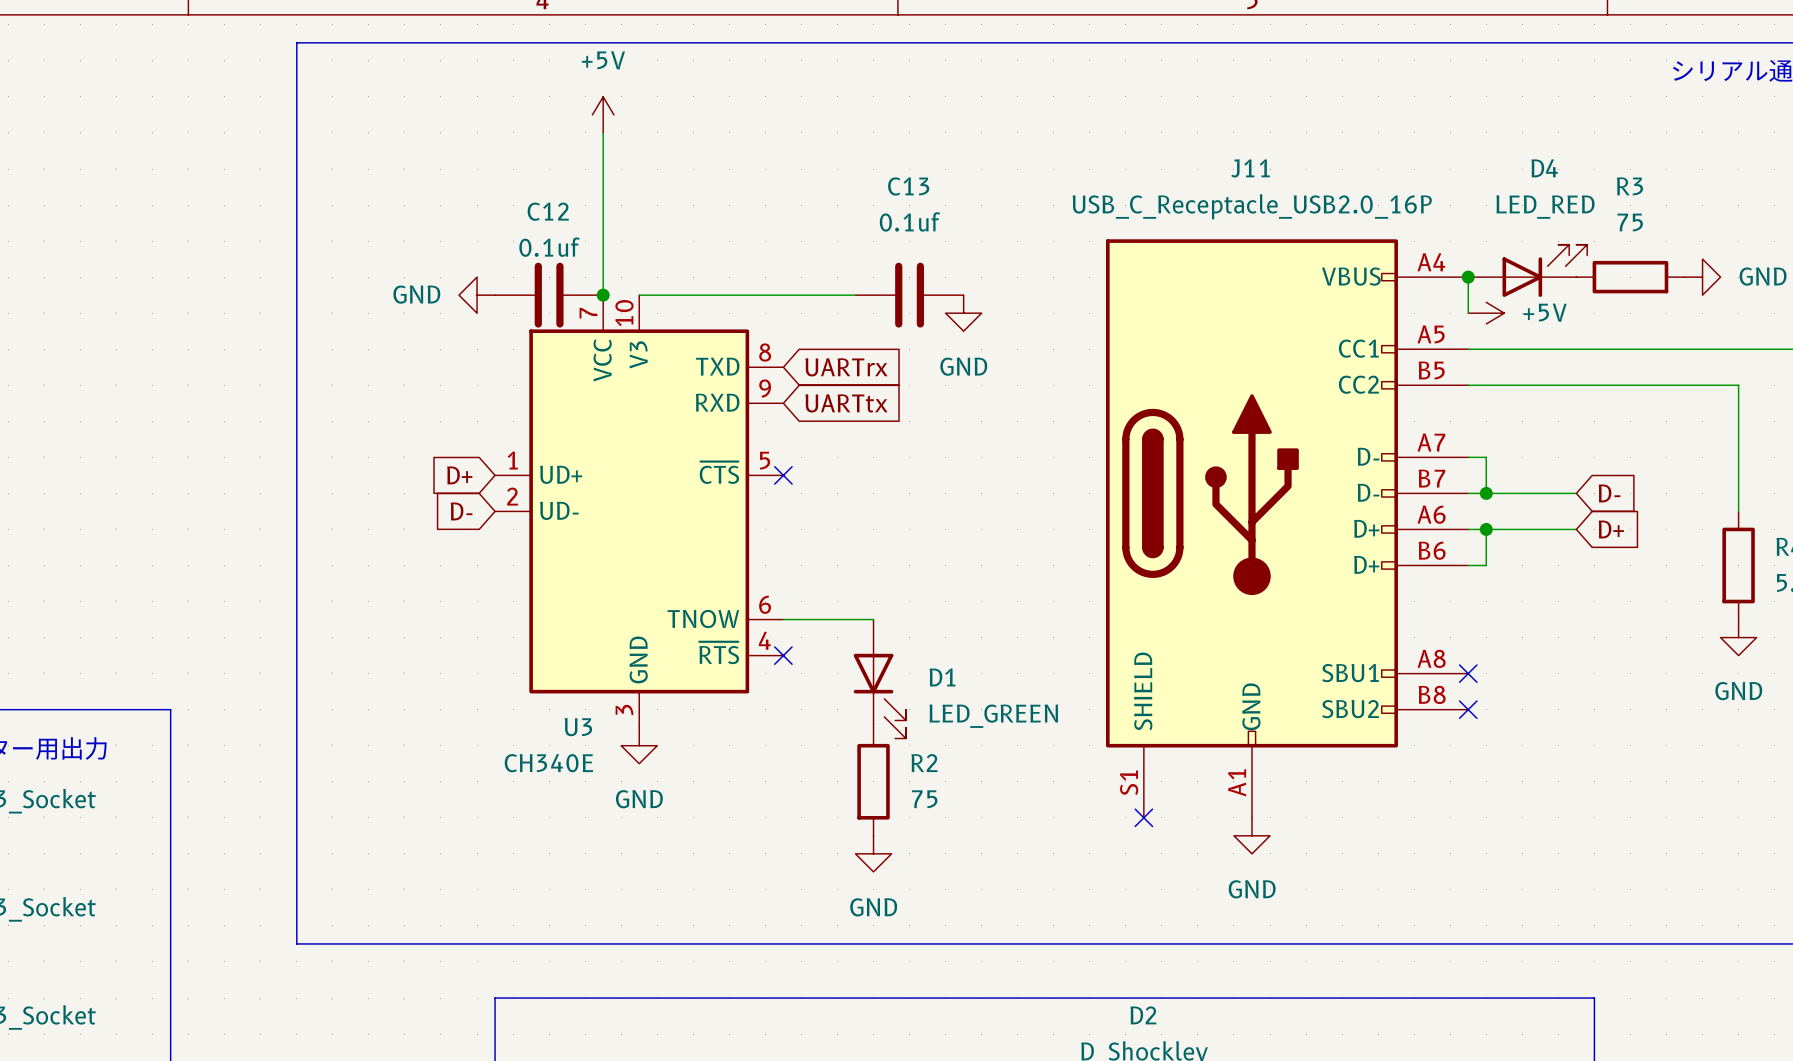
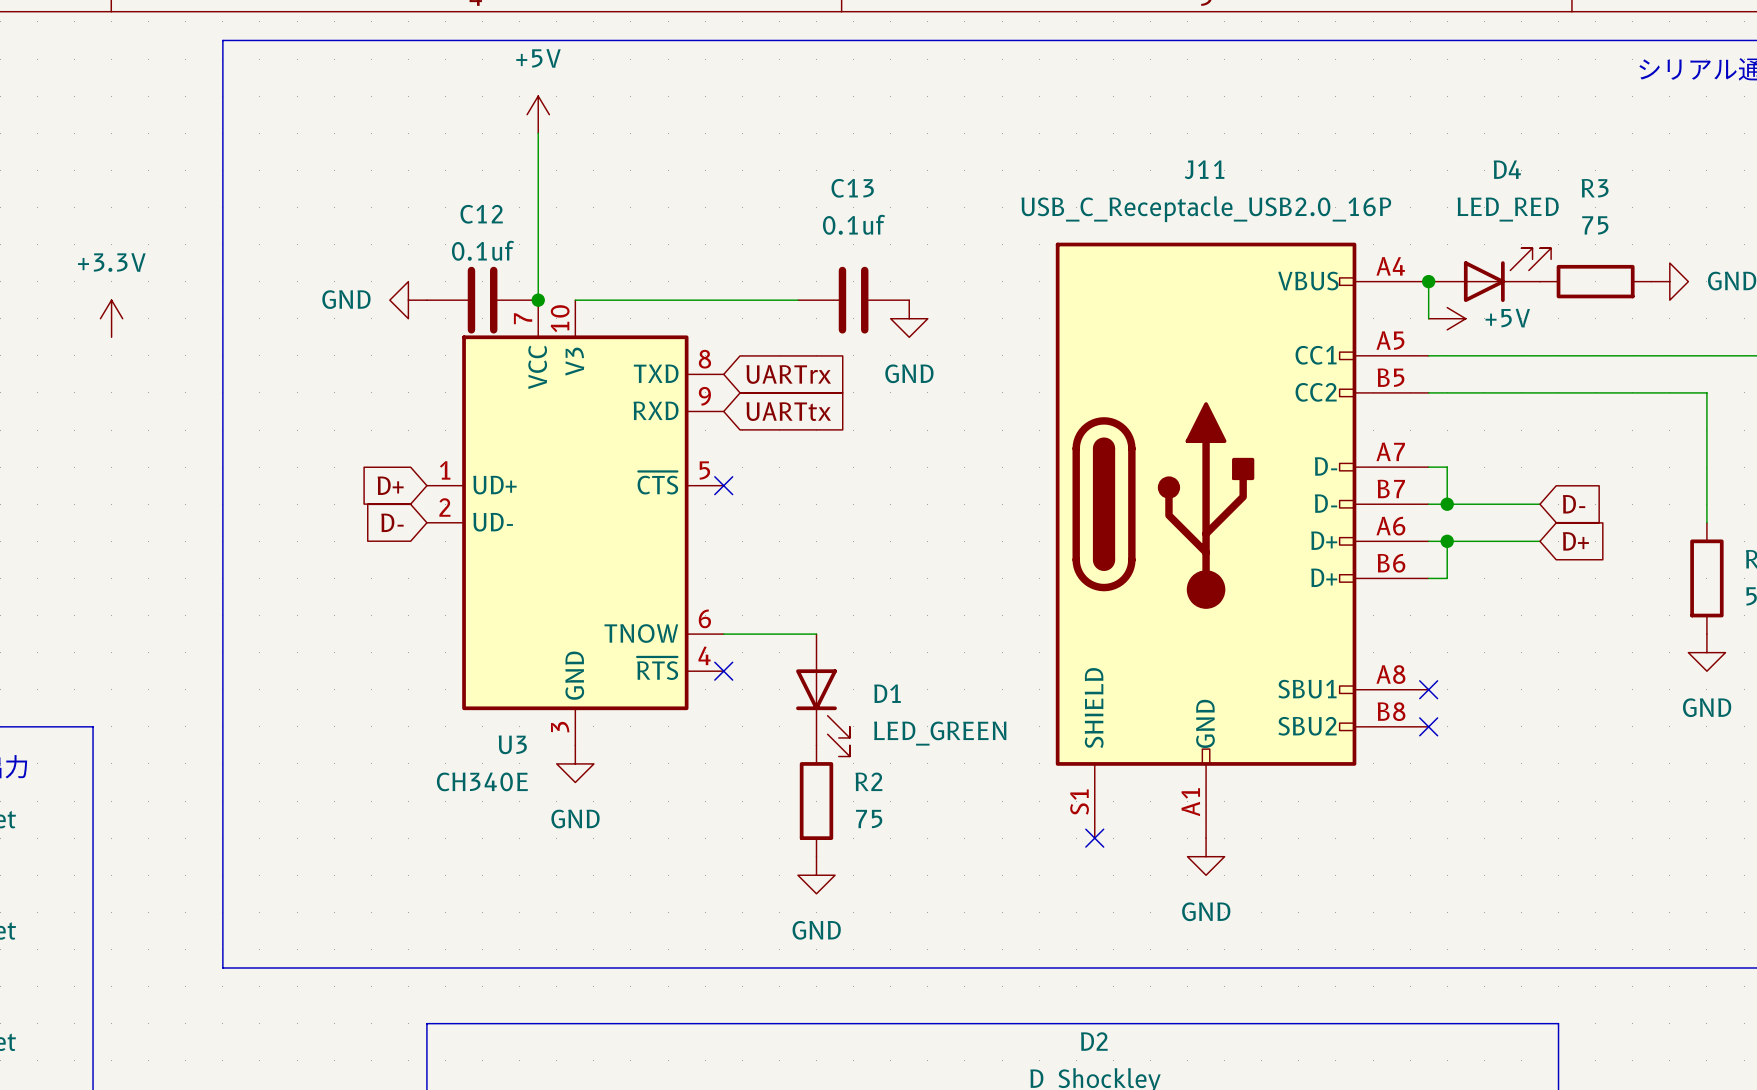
power symbol: none -> +3.3V (111, 318)

